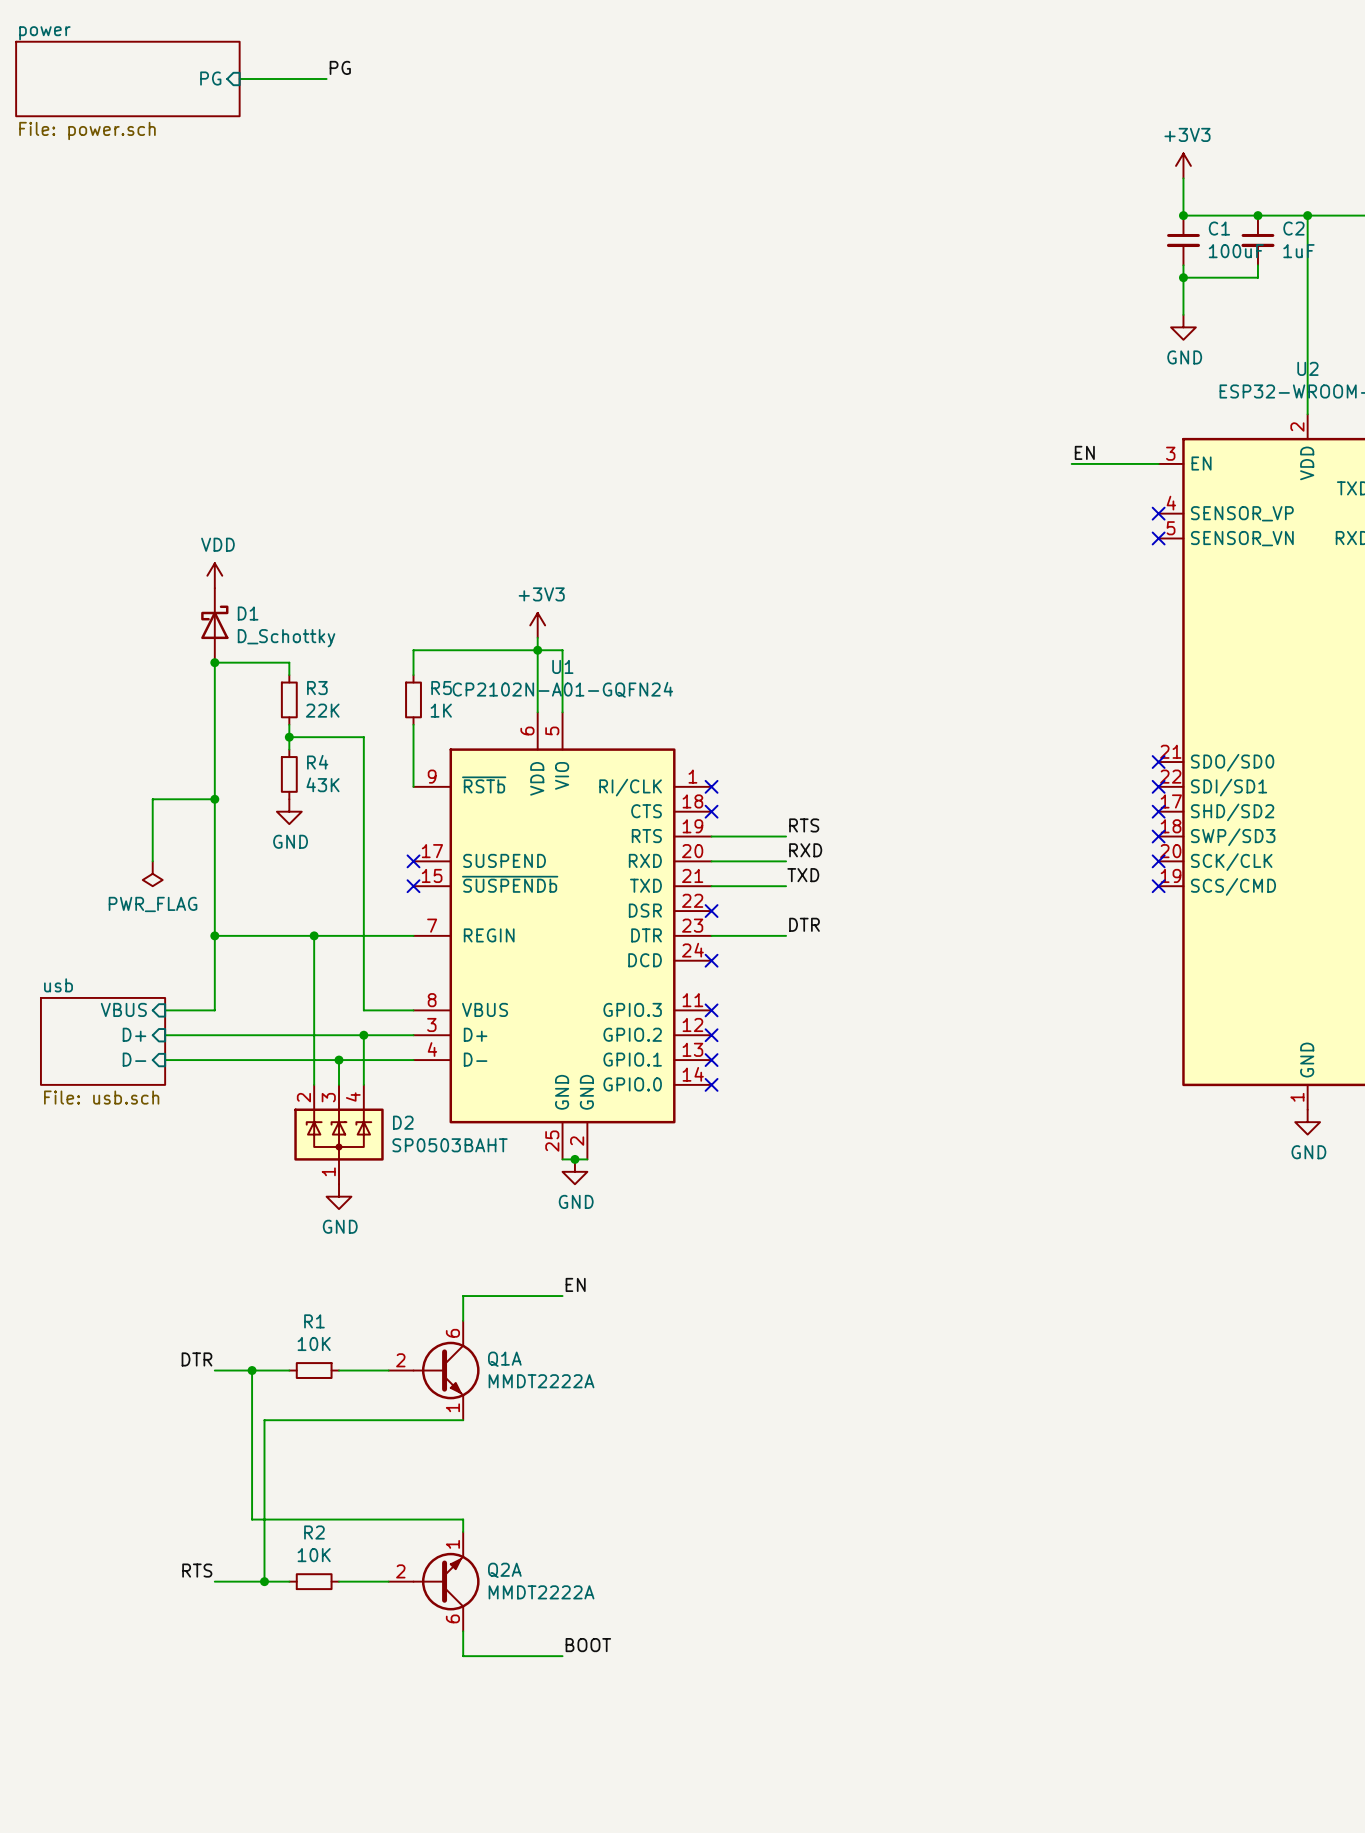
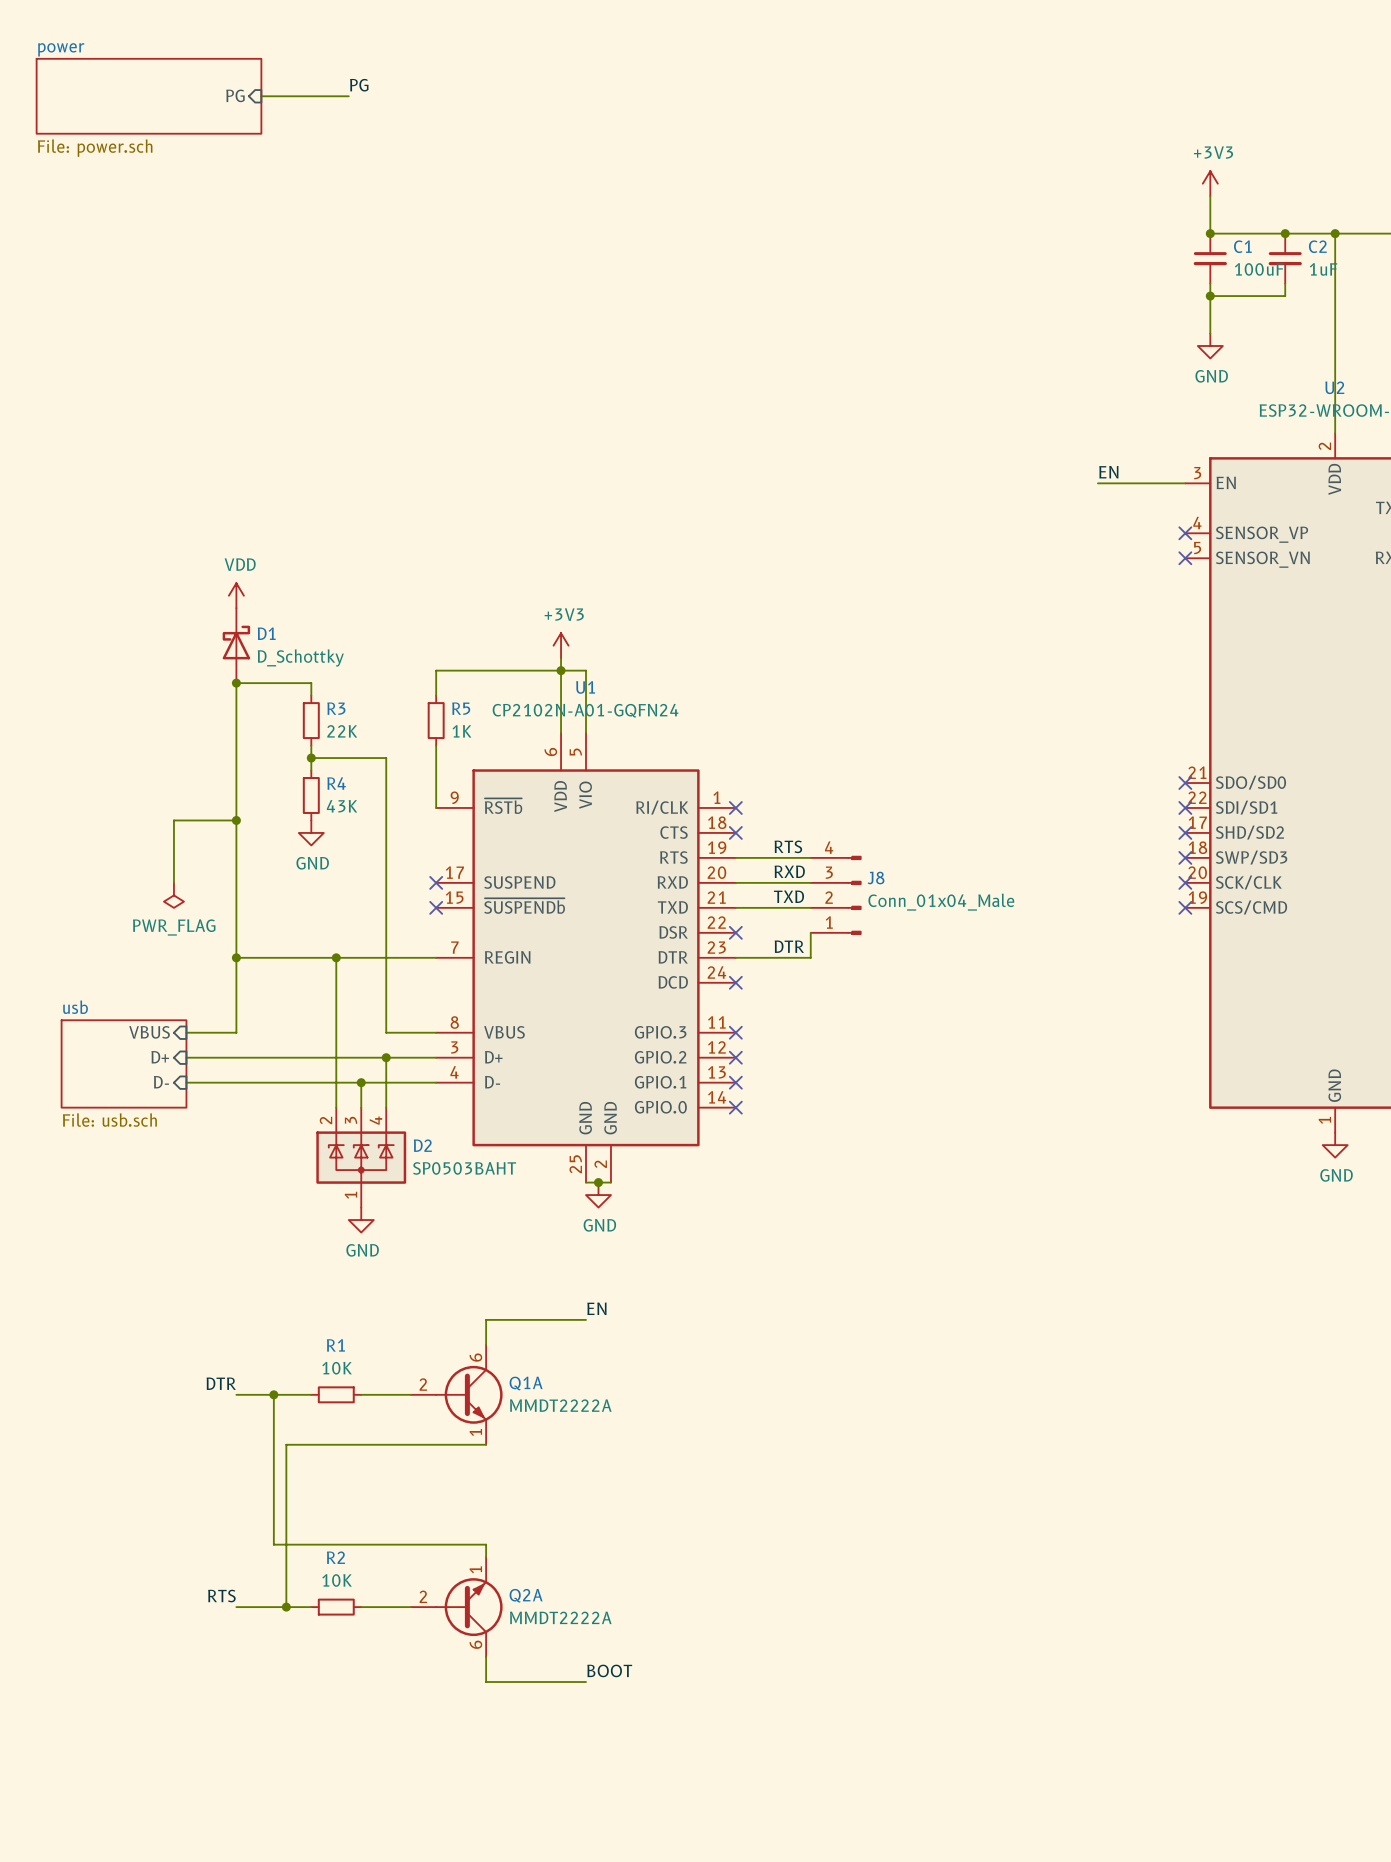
label position: RTS (804, 825) -> RTS (788, 846)
label position: RXD (805, 850) -> RXD (789, 871)
J8: none -> Conn_01x04_Male (836, 895)
label position: TXD (803, 875) -> TXD (788, 896)
wire: none -> (810, 932) (810, 957)
label position: DTR (804, 924) -> DTR (789, 946)

